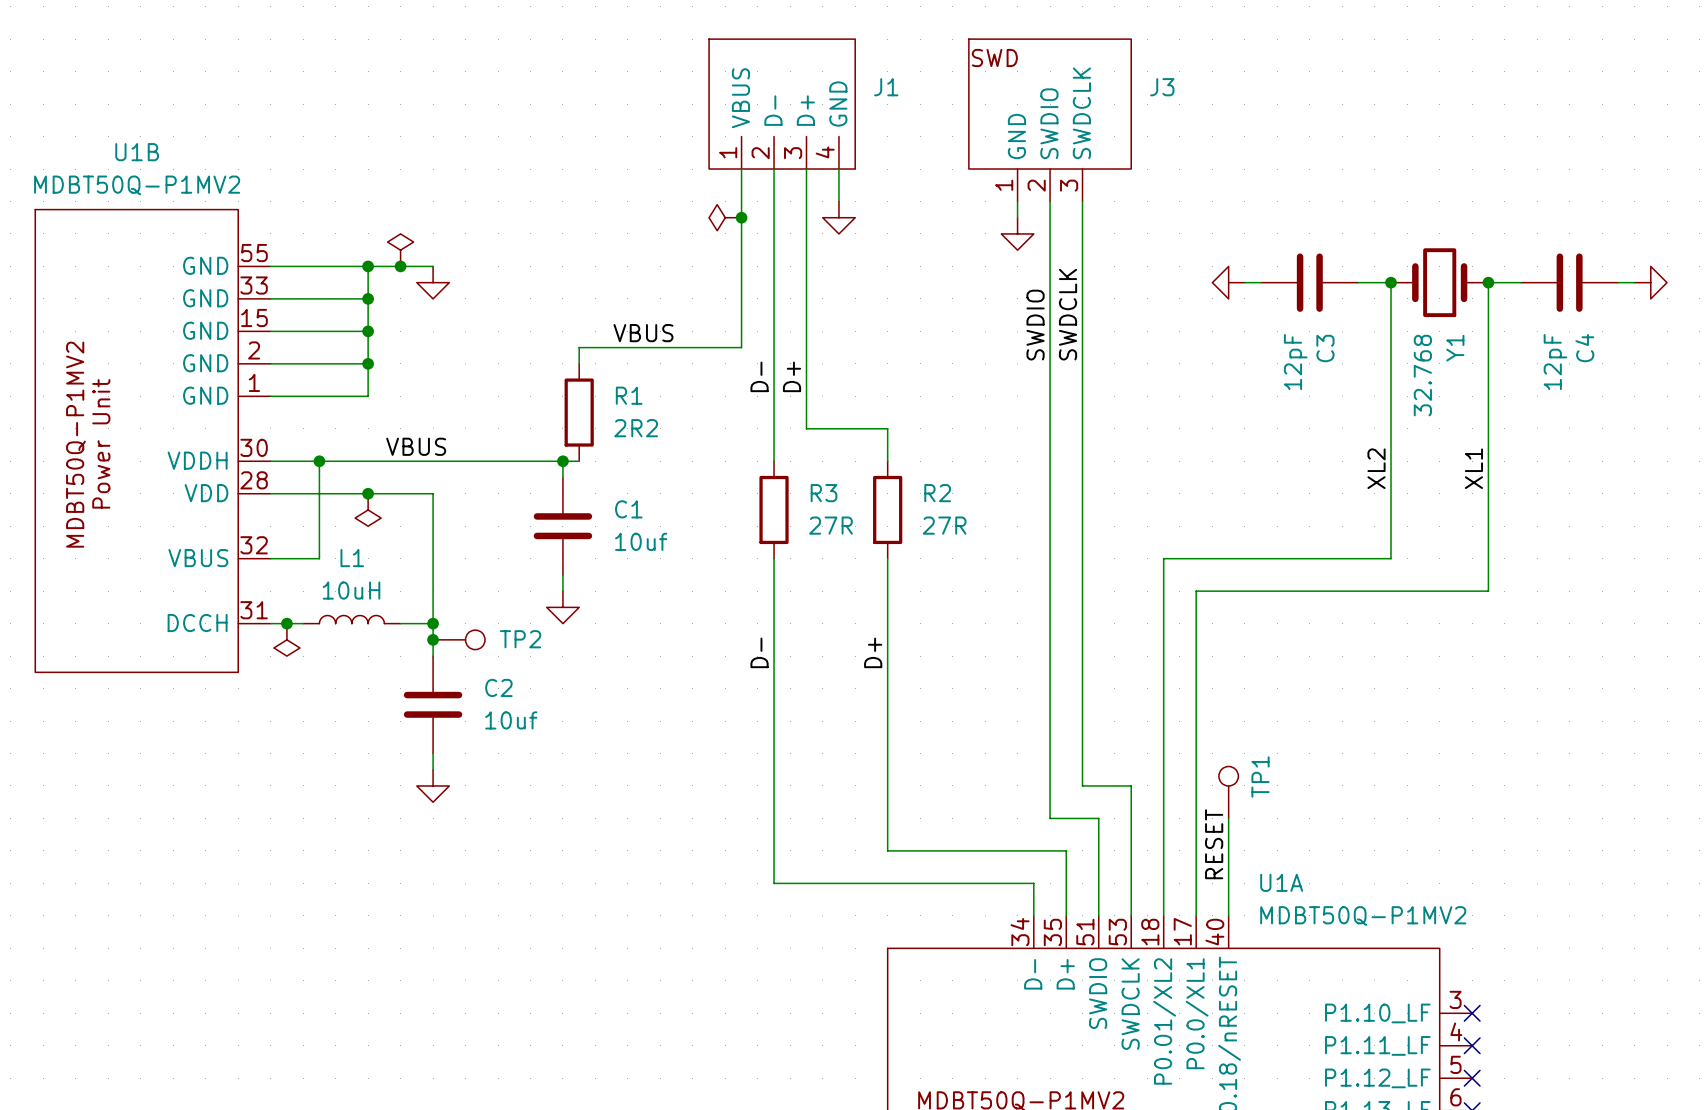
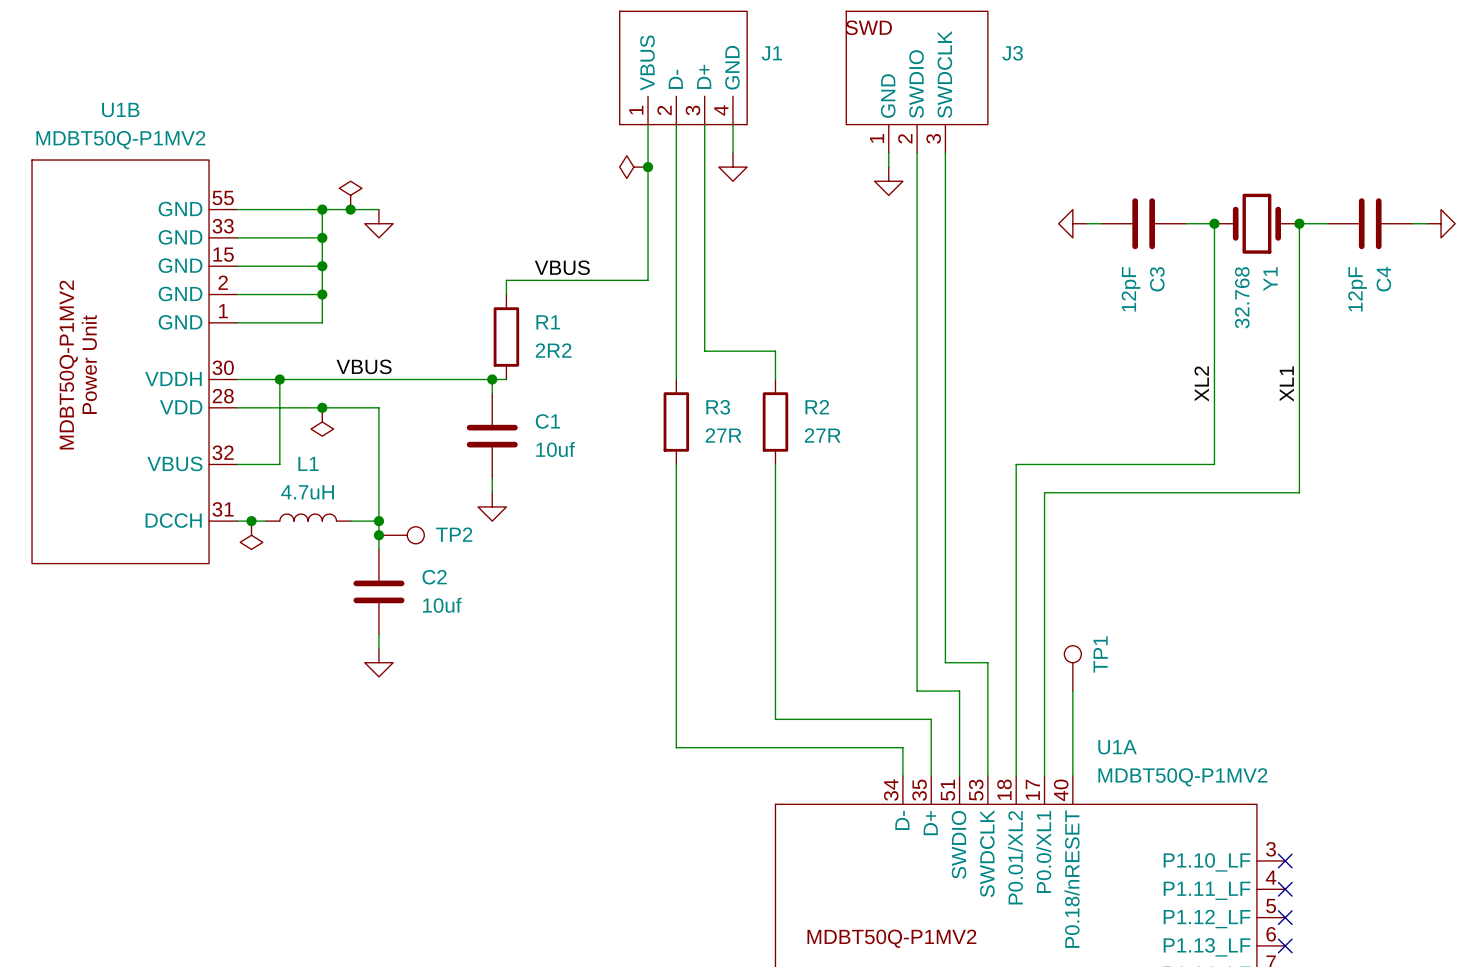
label: SWDCLK (1068, 314) -> none
label: SWDIO (1035, 325) -> none
label: D- (759, 376) -> none
label: D+ (792, 376) -> none
L1 value: 10uH (351, 590) -> 4.7uH (307, 492)
label: D- (759, 652) -> none
label: D+ (873, 652) -> none
label: RESET (1214, 844) -> none

